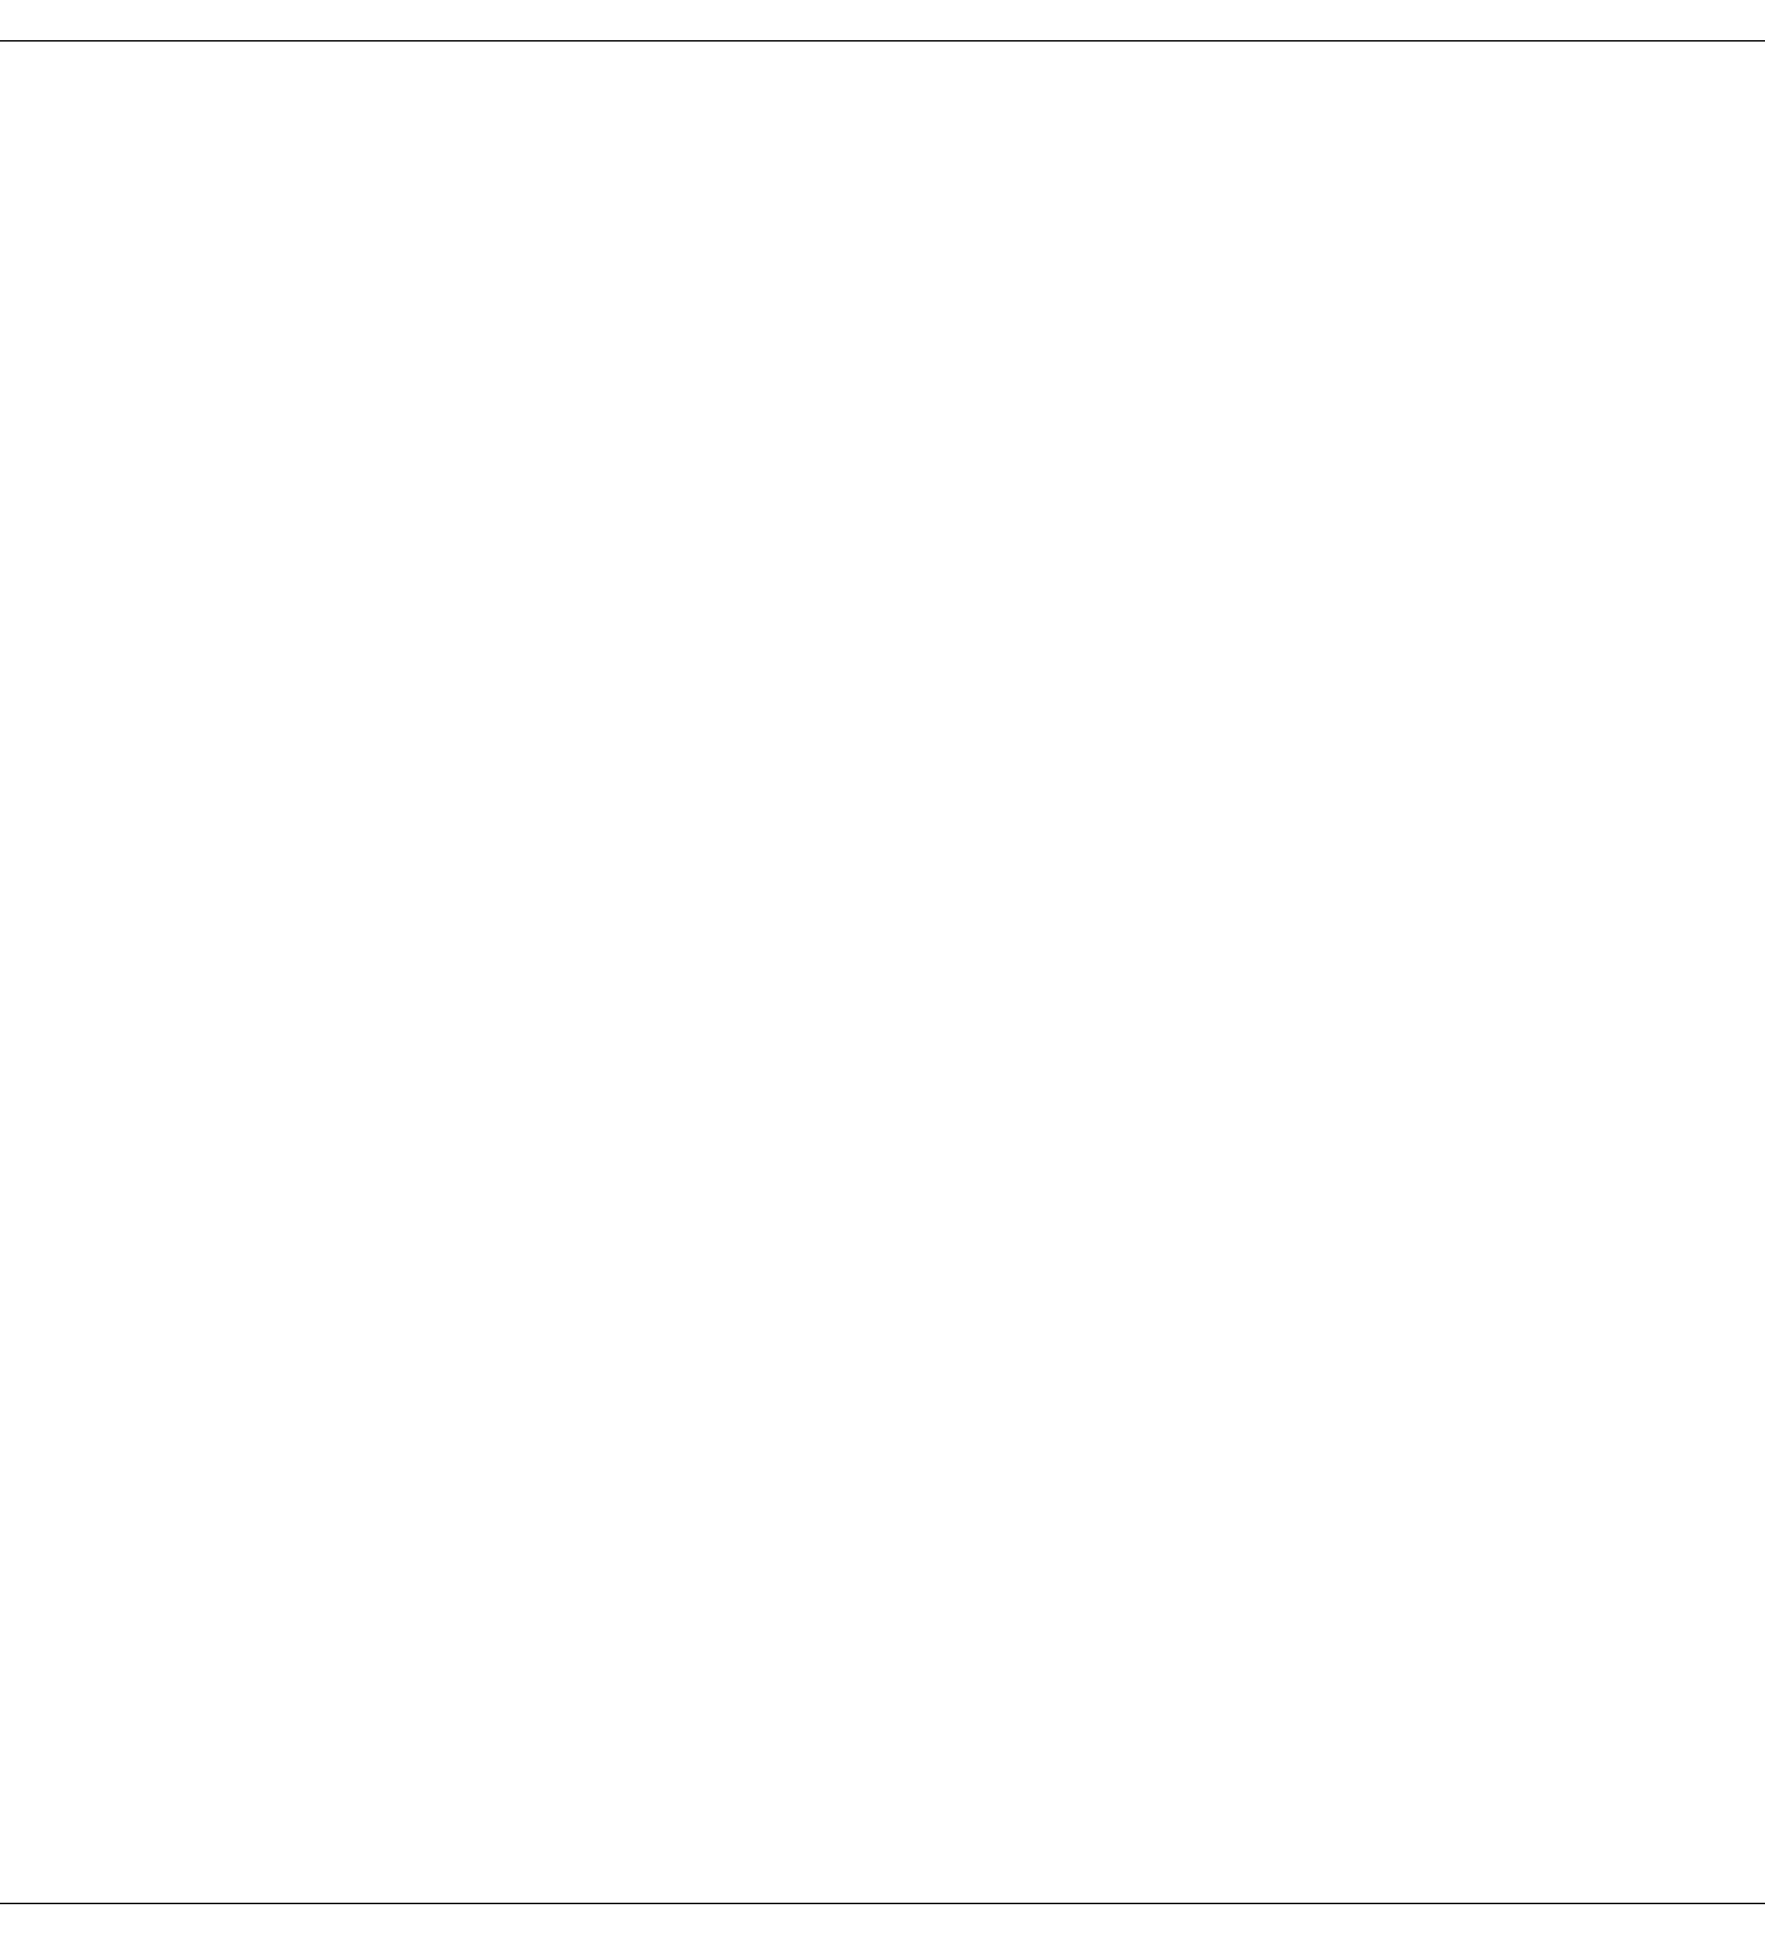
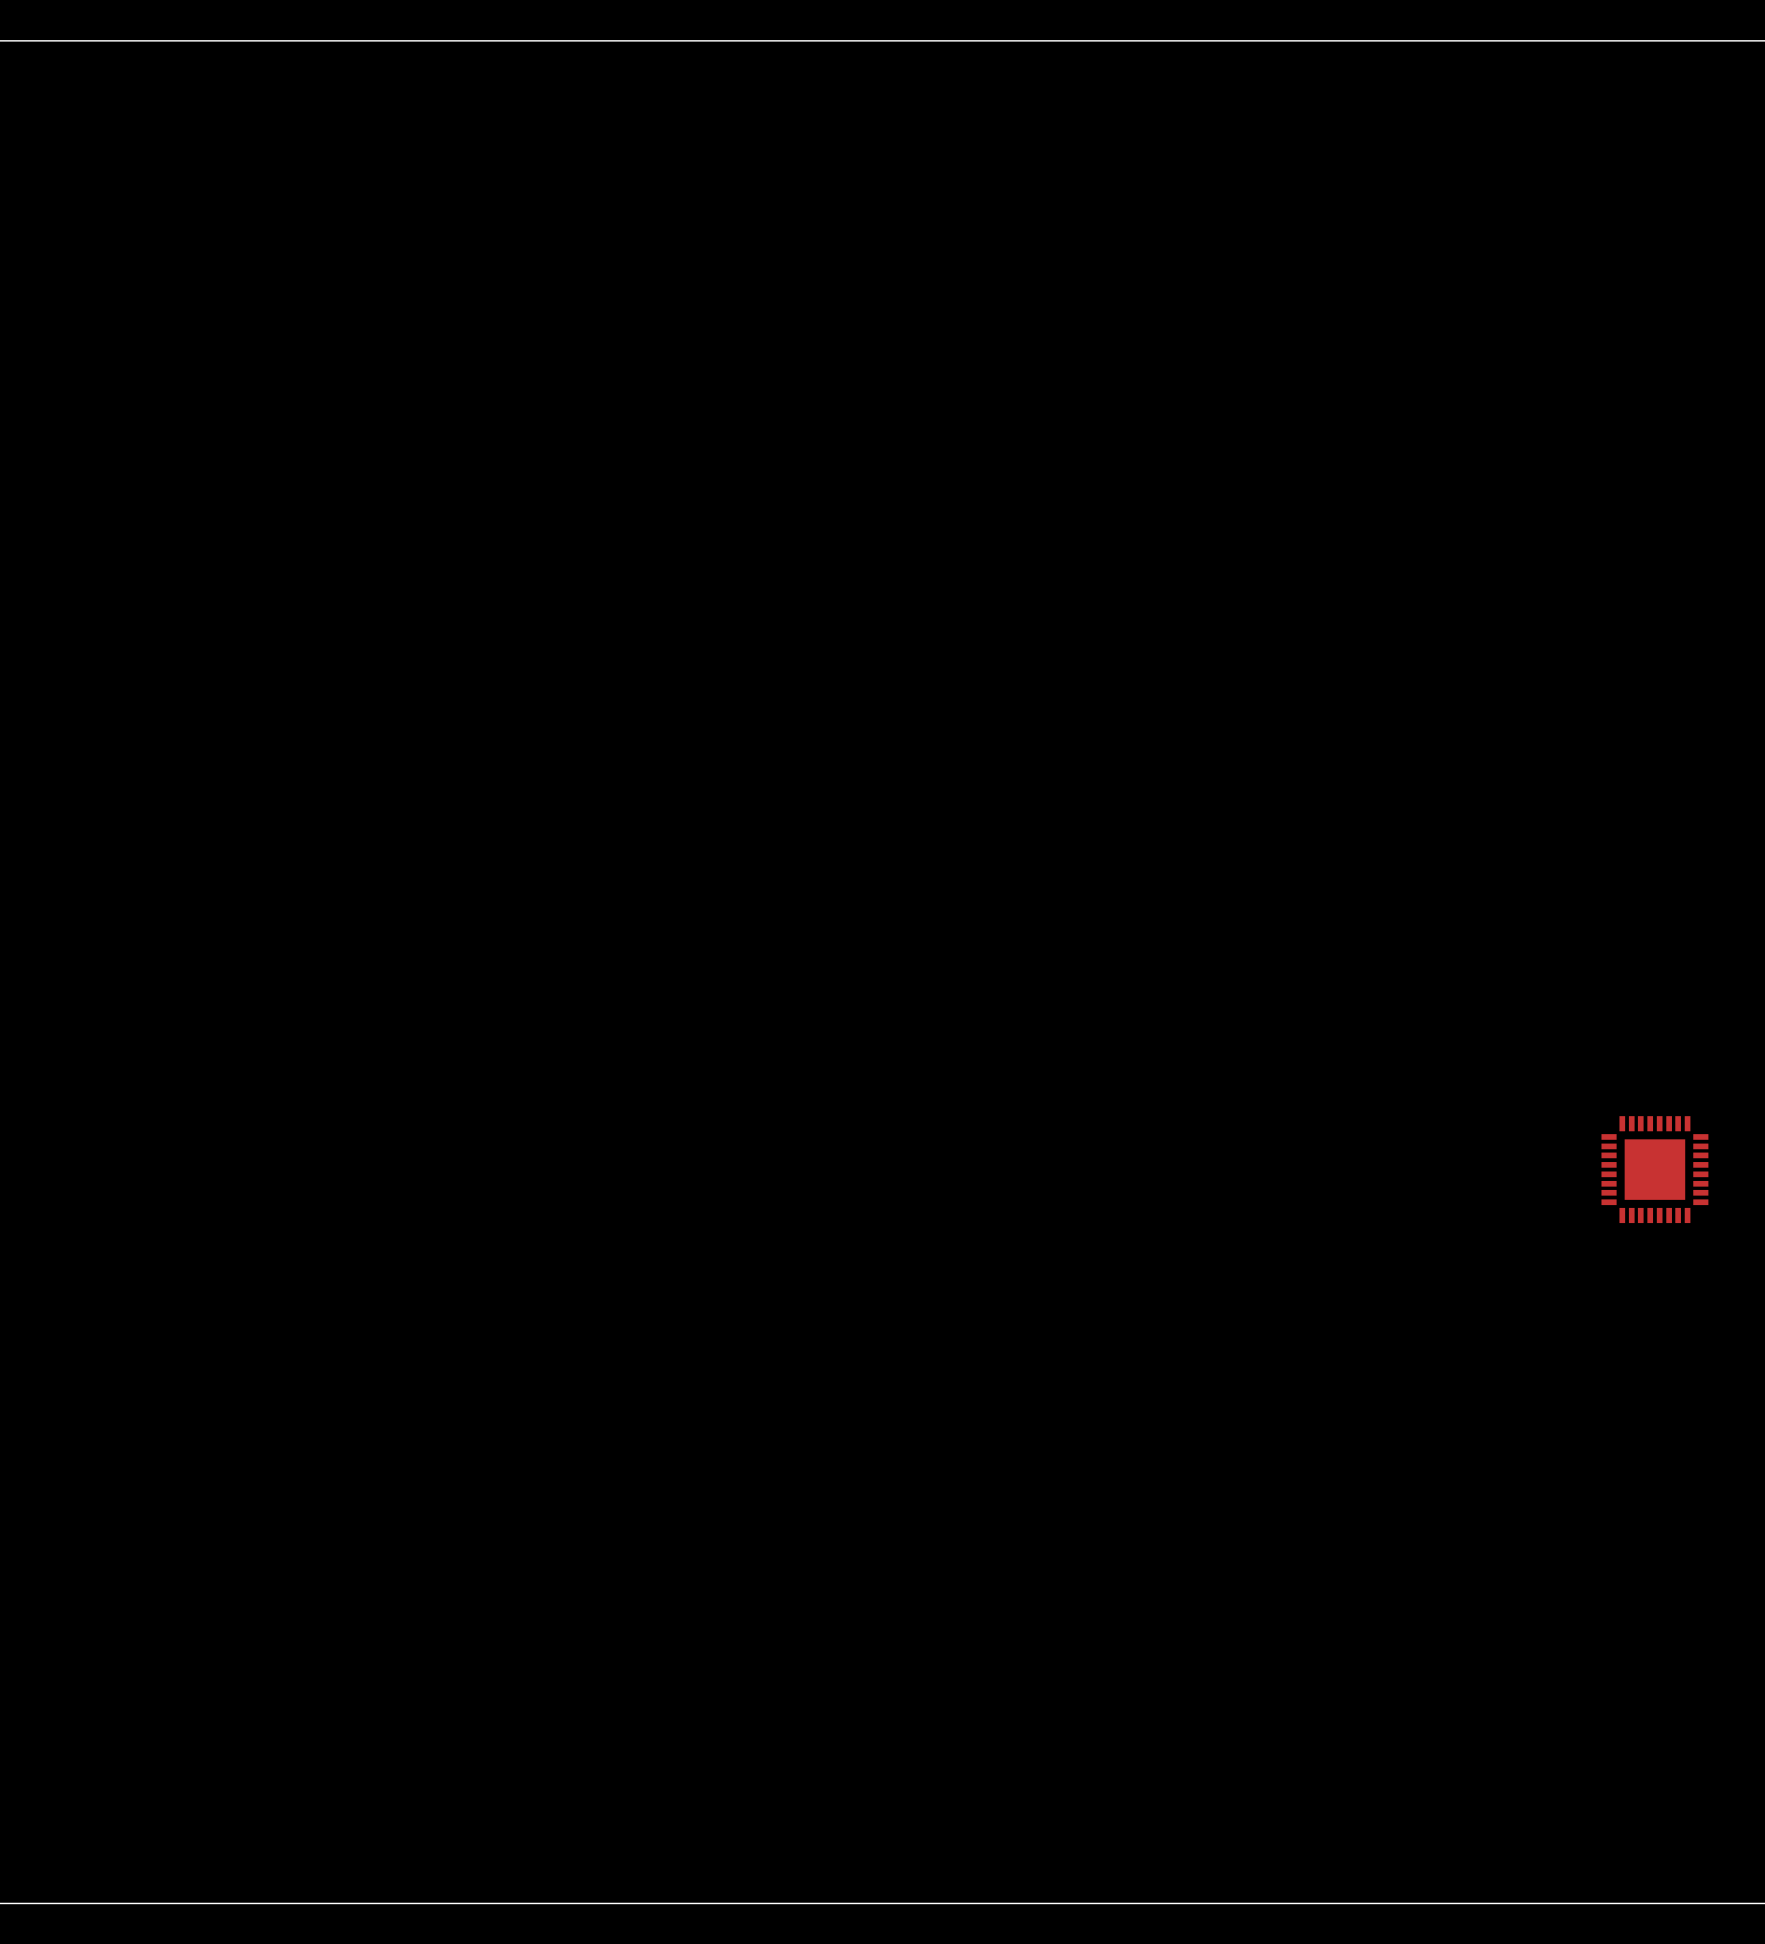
part: none -> (1654, 1169)

